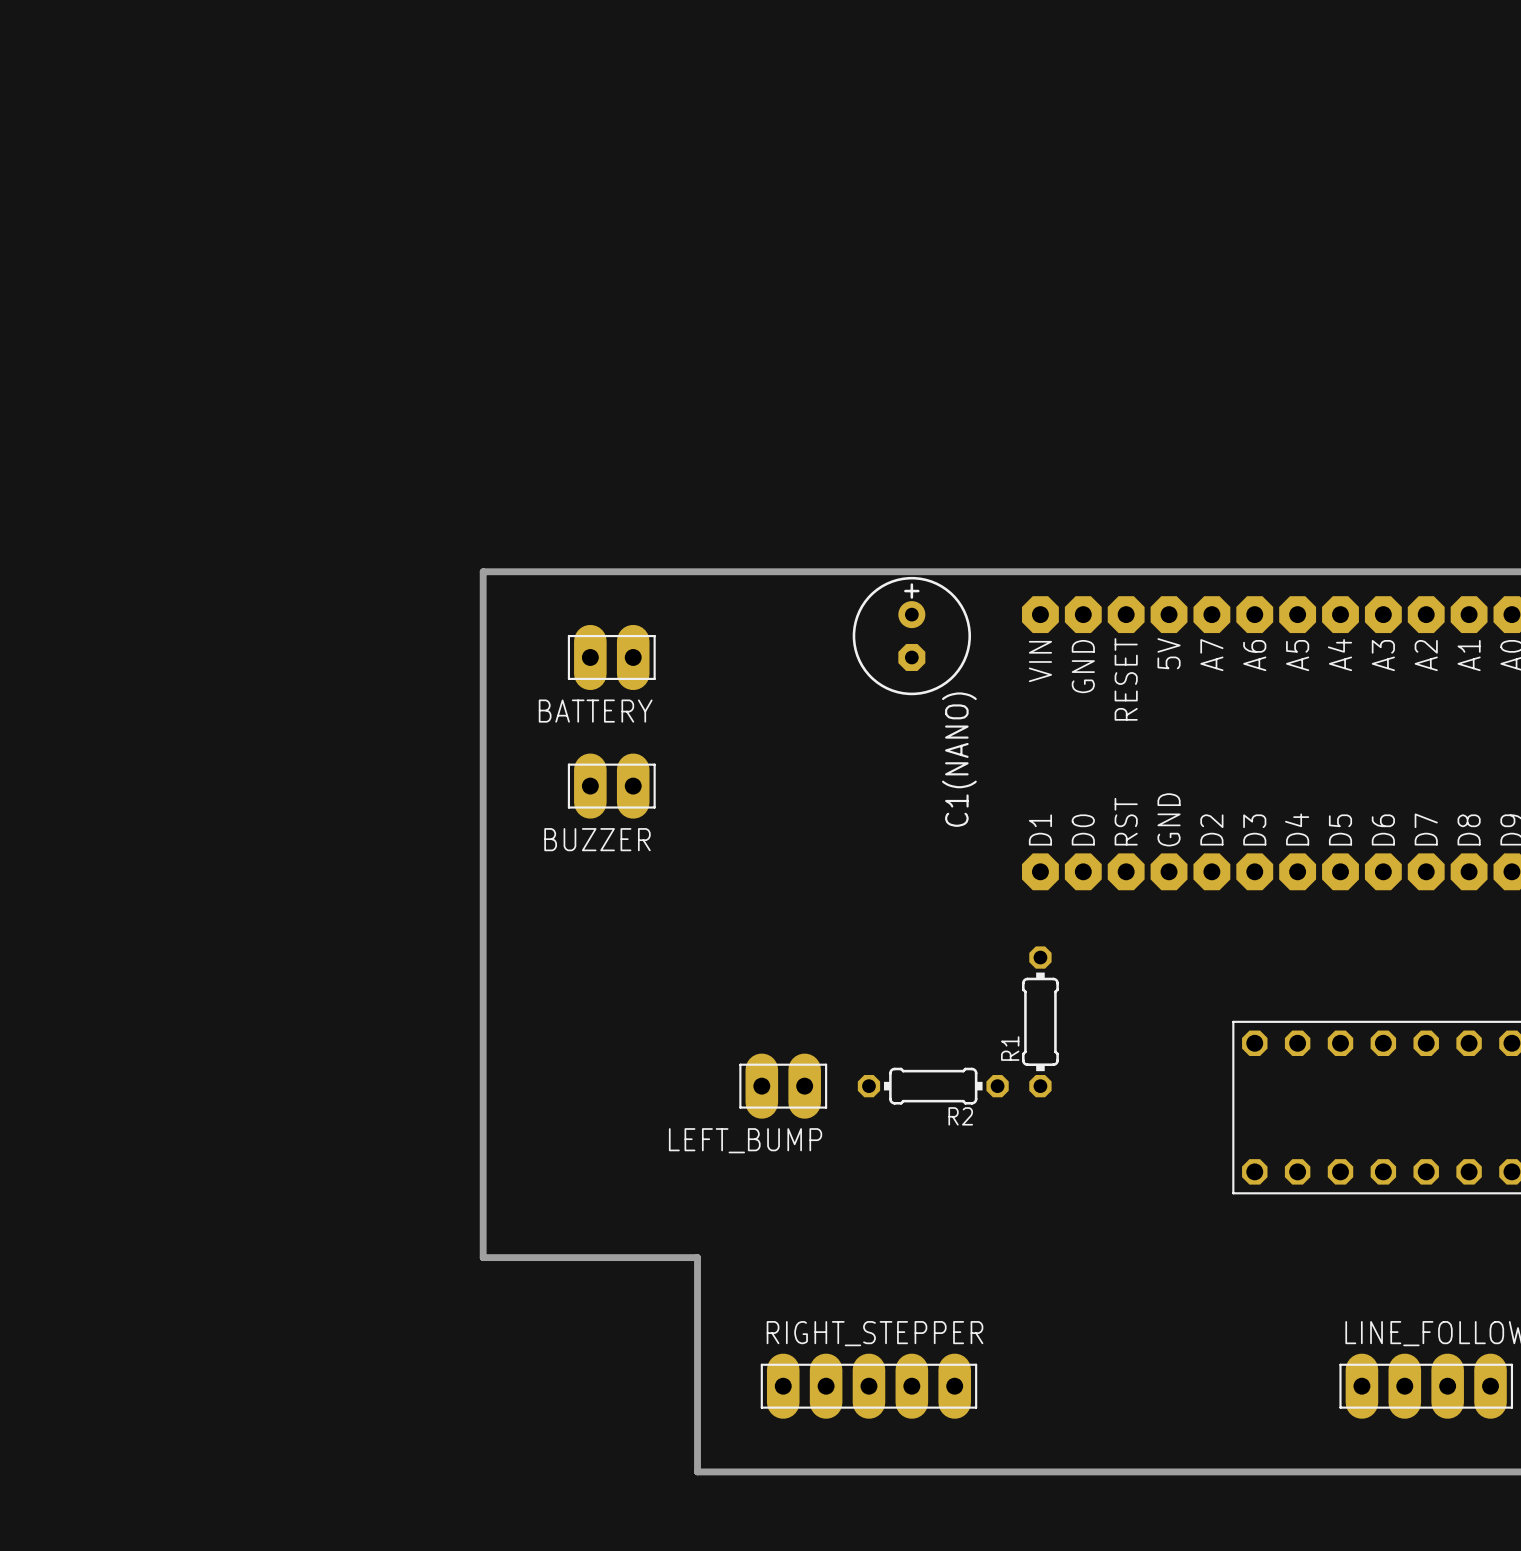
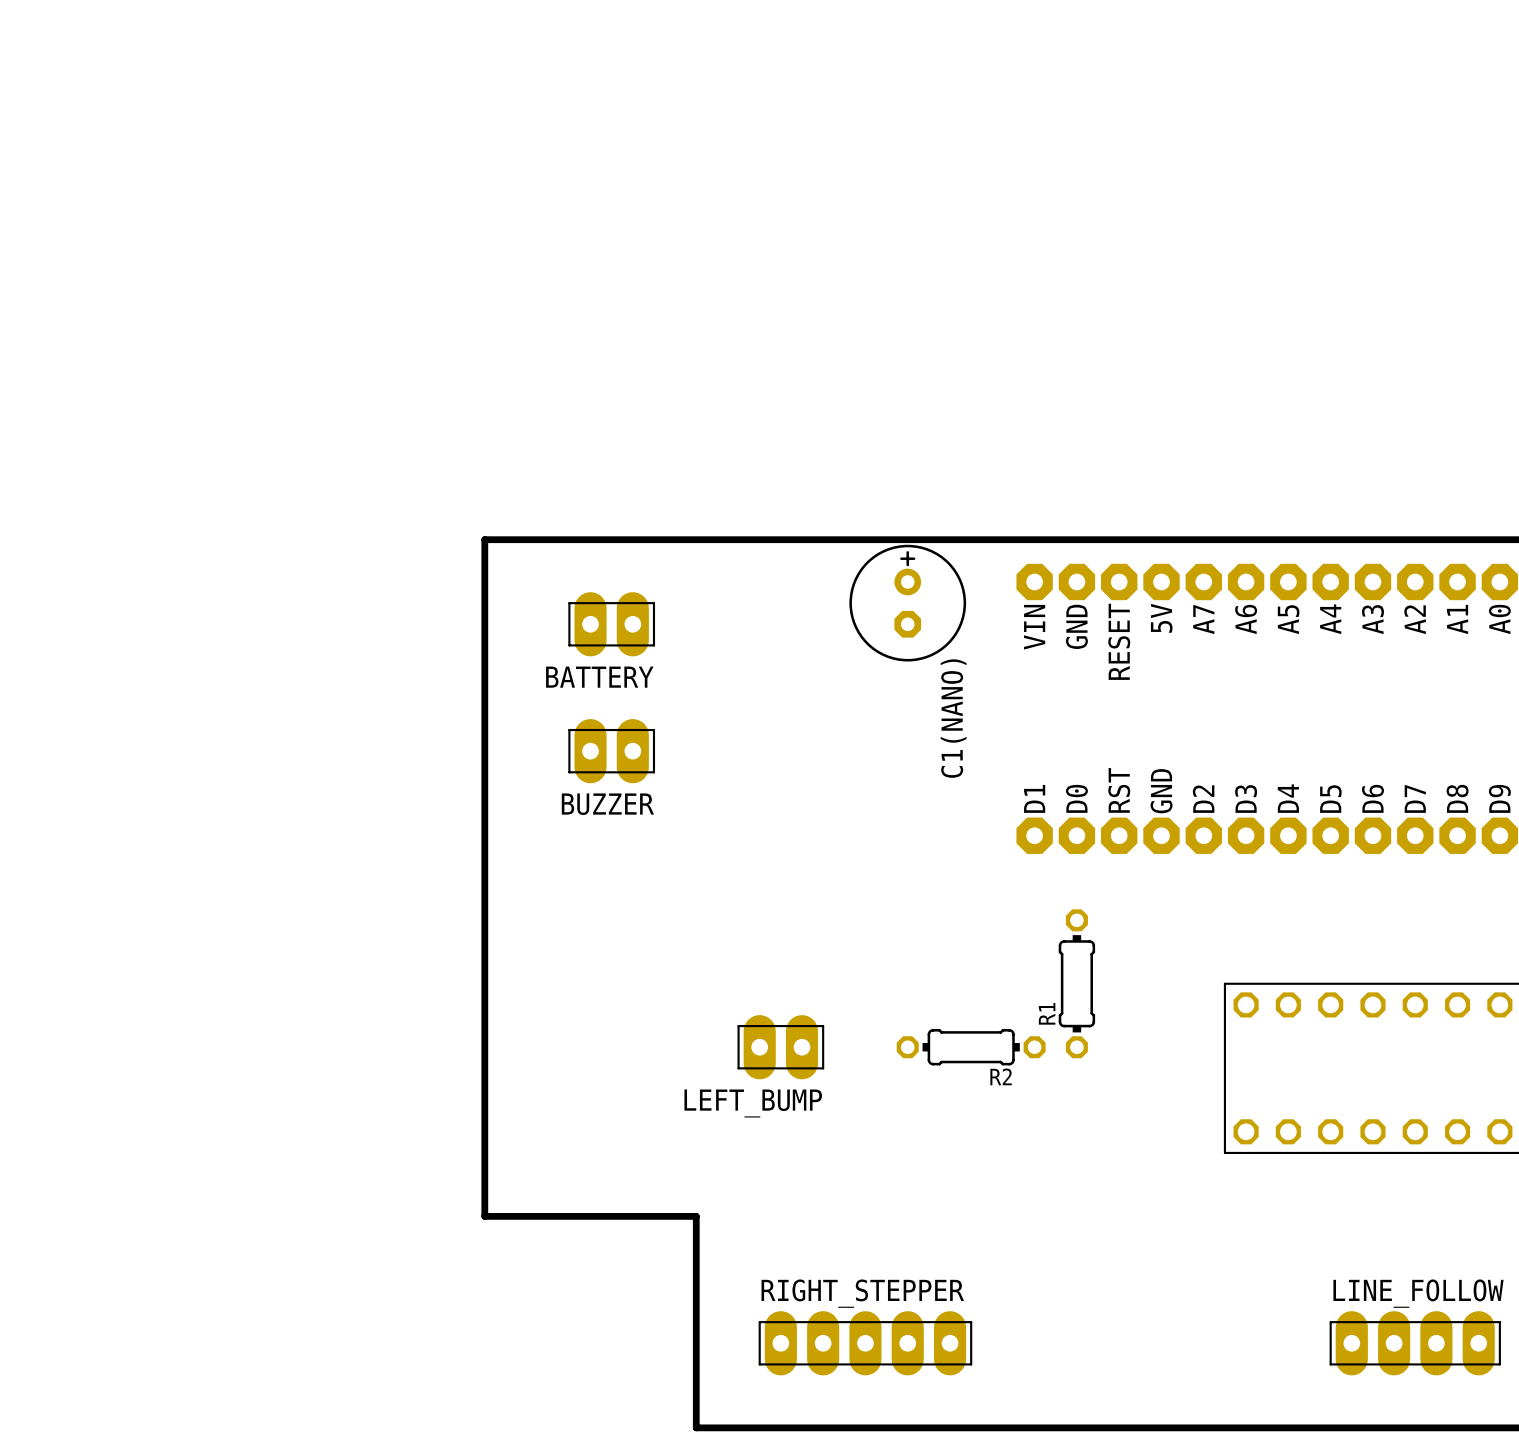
R1 position: (1040, 1021) -> (1076, 983)
R2 position: (933, 1086) -> (971, 1047)

